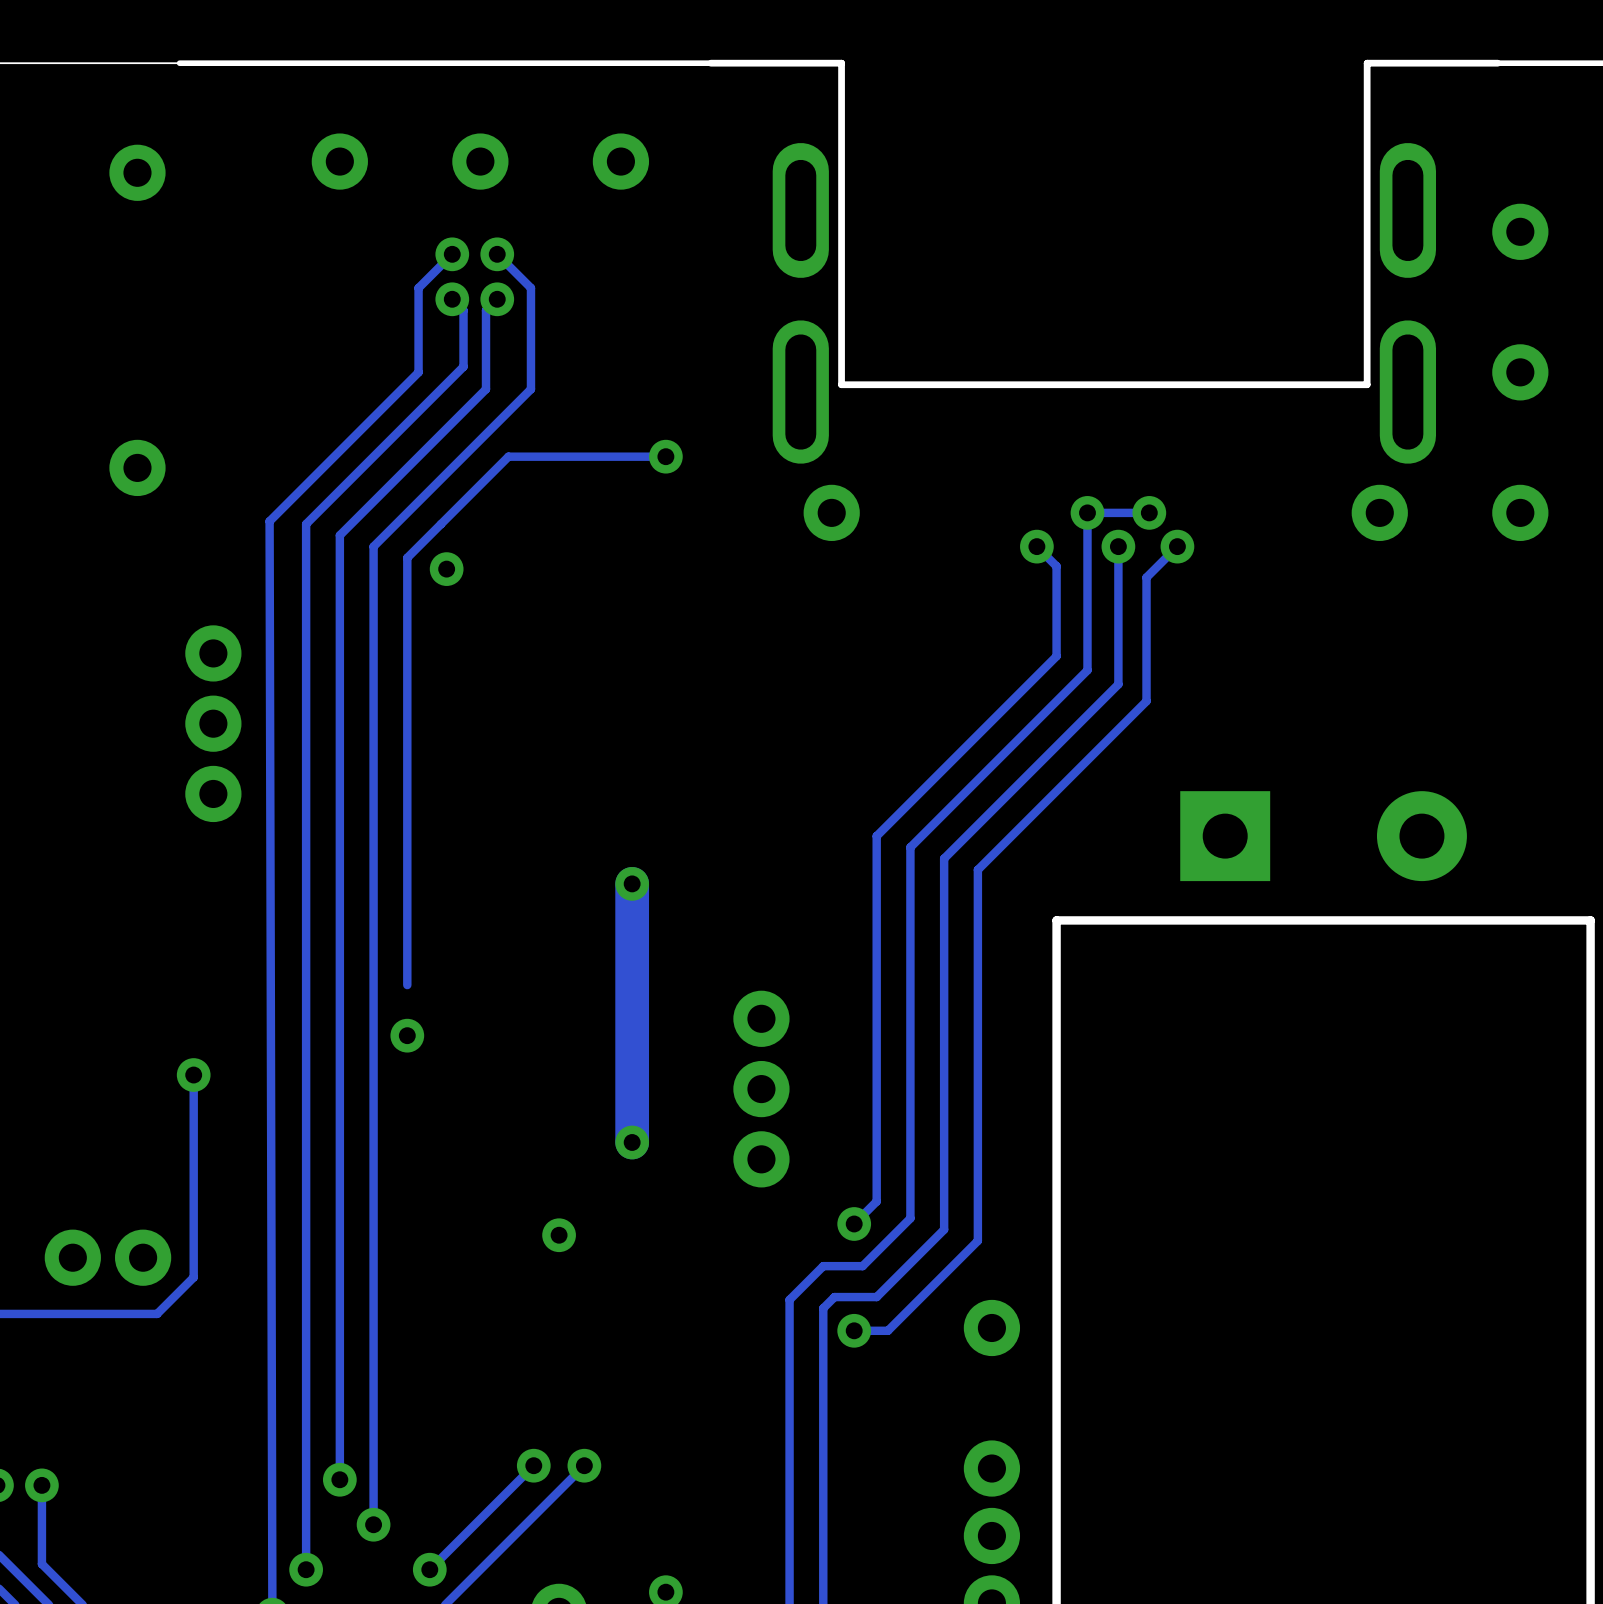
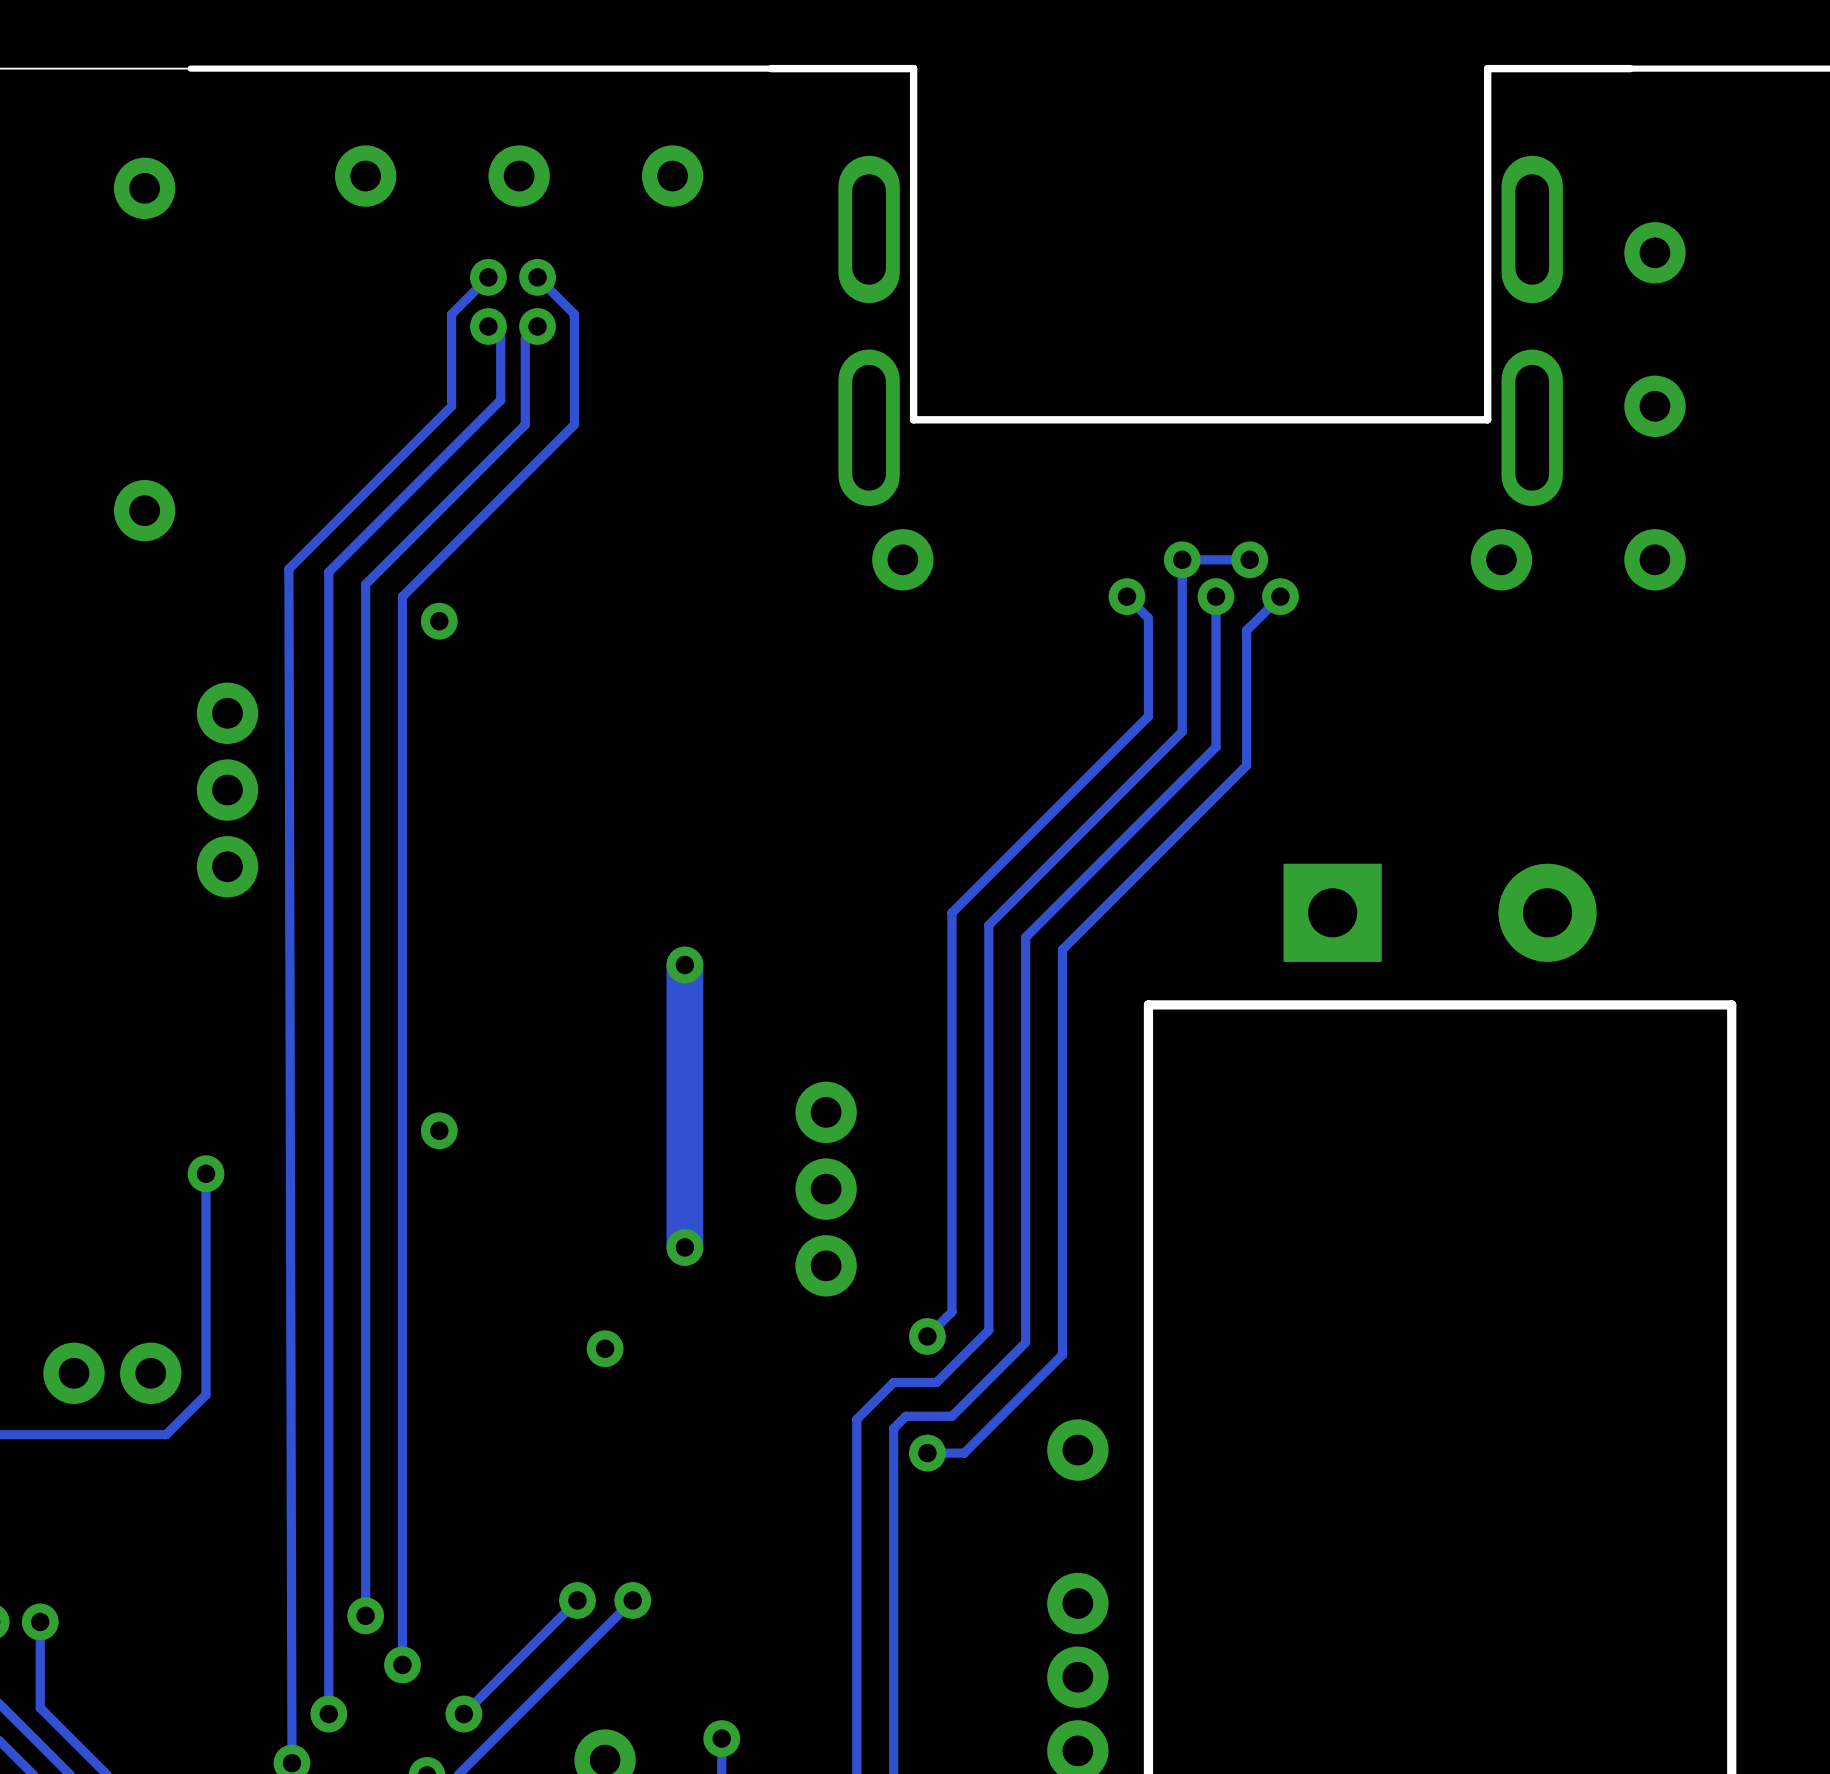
track: (665, 456) (508, 456) (407, 557) (407, 985) -> none
via: (665, 456) -> none
via position: (446, 569) -> (439, 621)

